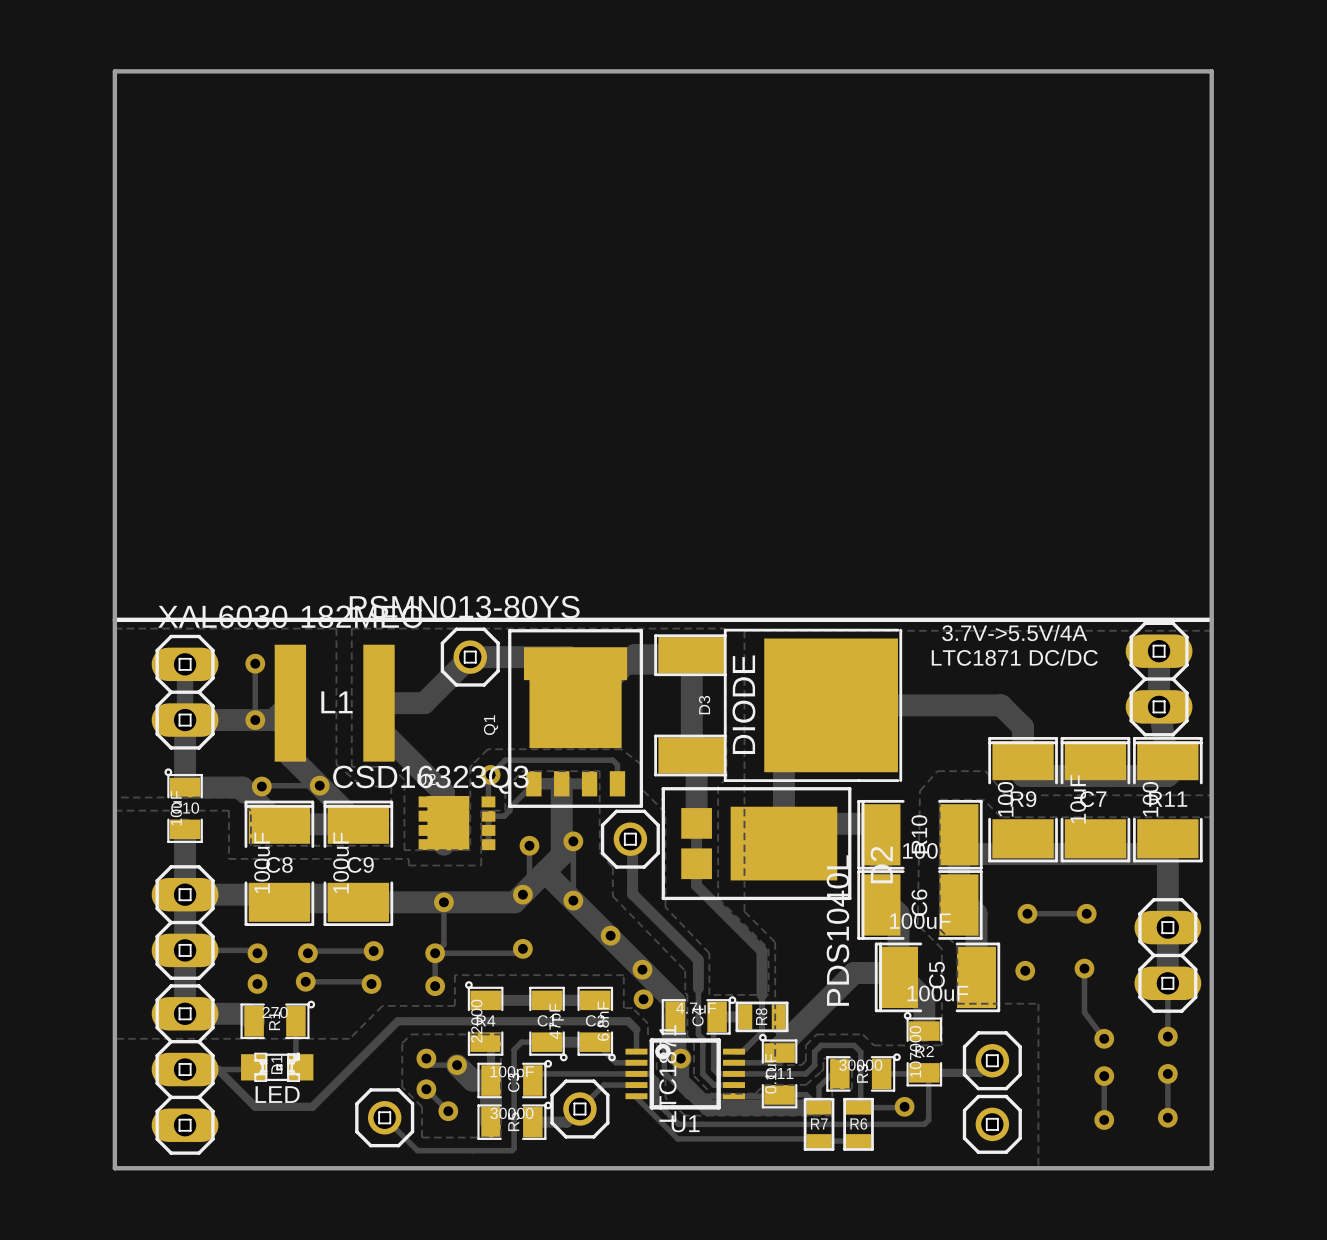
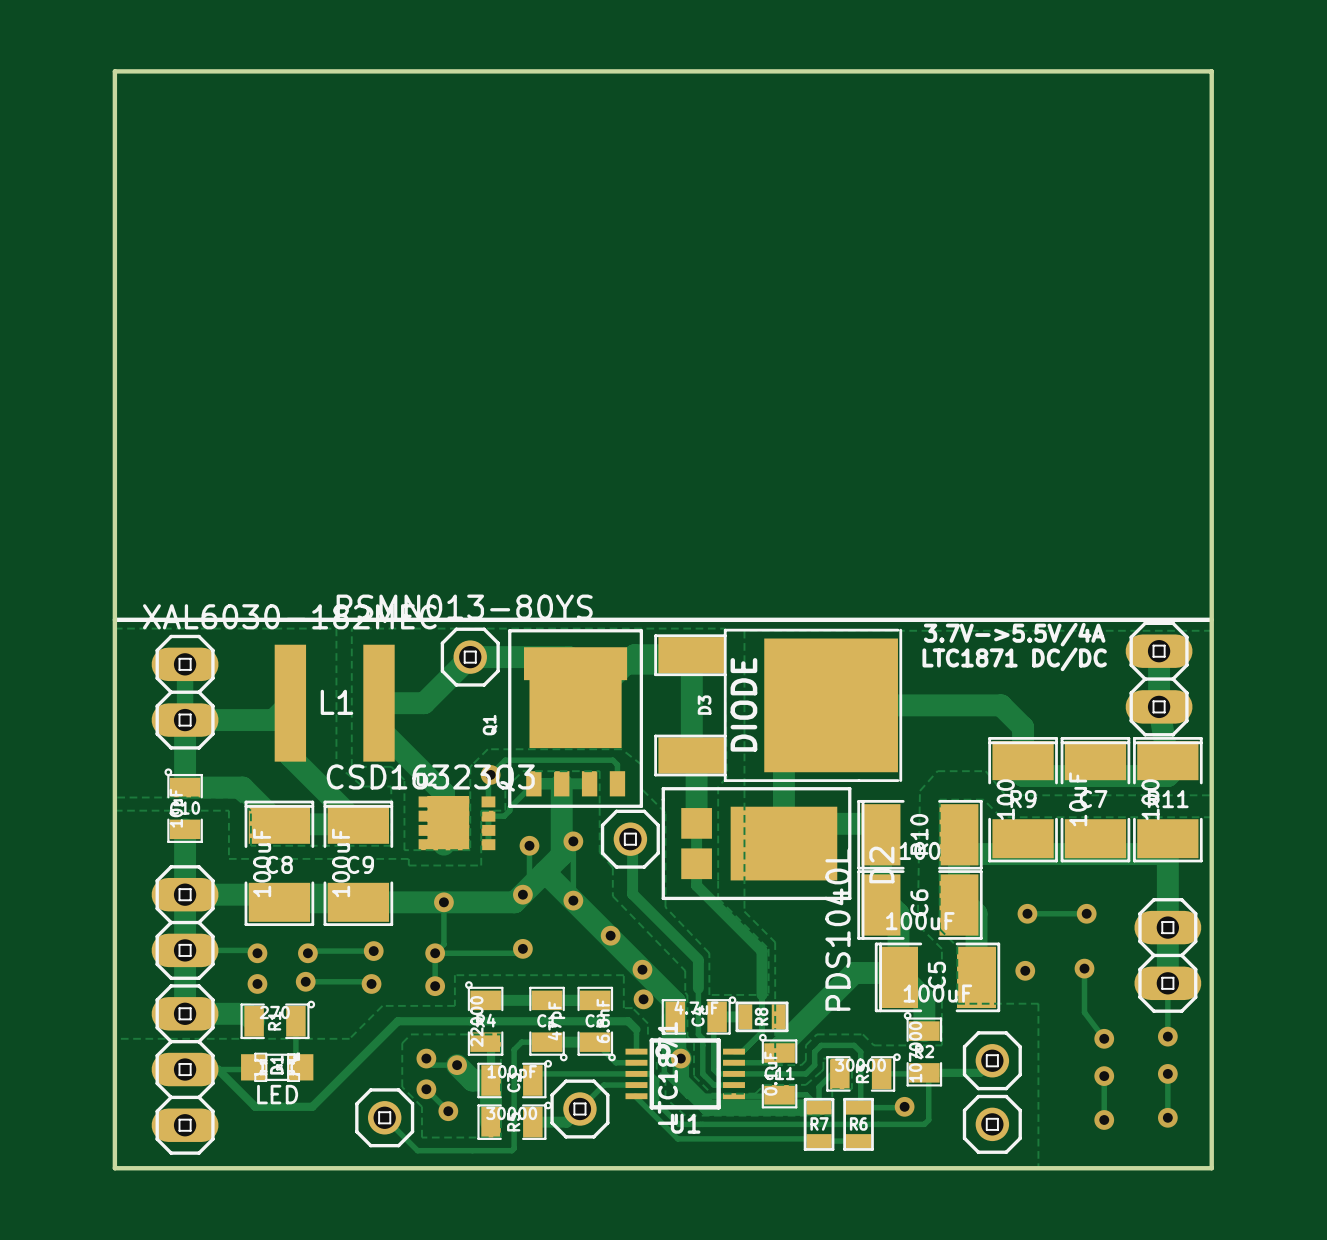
track: (255, 663) (255, 720) -> none
via: (255, 663) -> none
via: (255, 720) -> none
track: (319, 785) (261, 786) -> none
via: (319, 785) -> none
via: (261, 786) -> none

